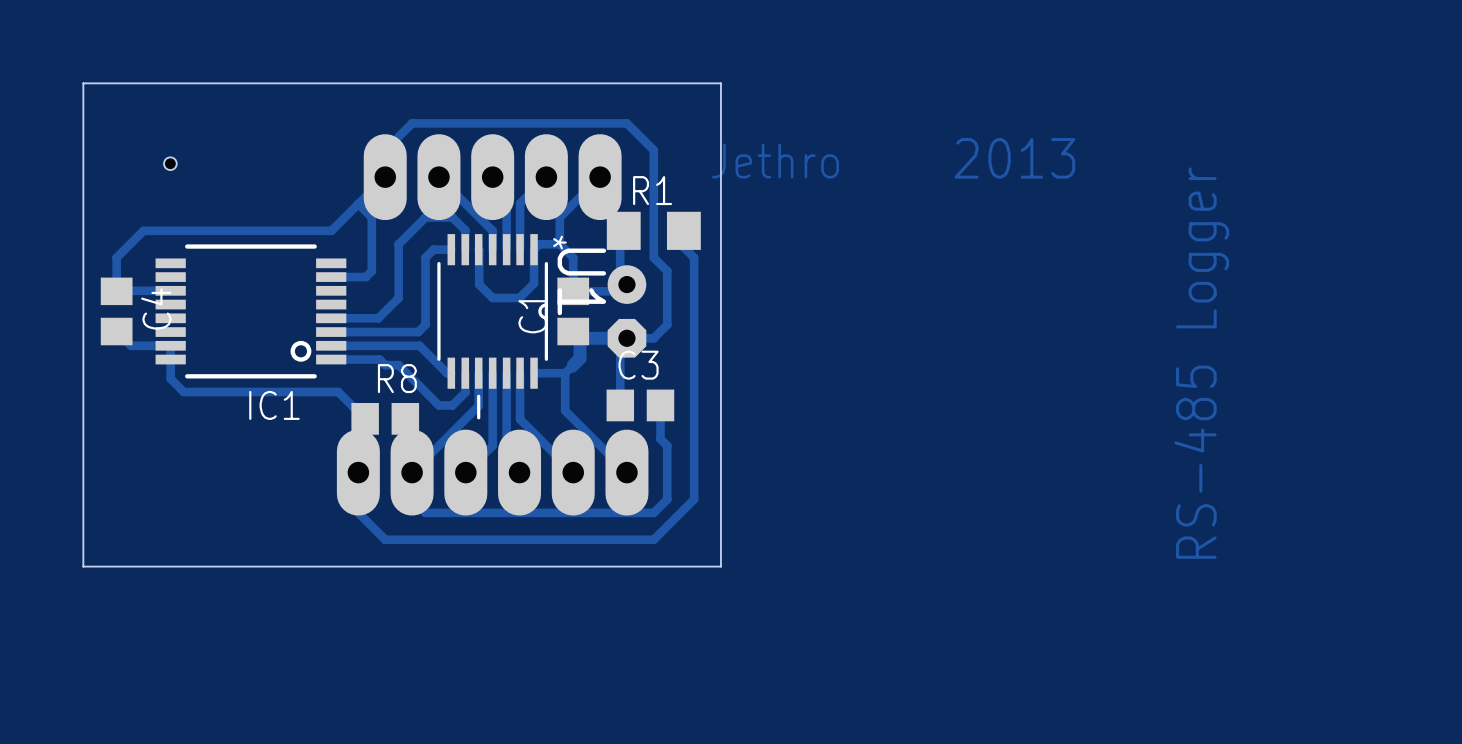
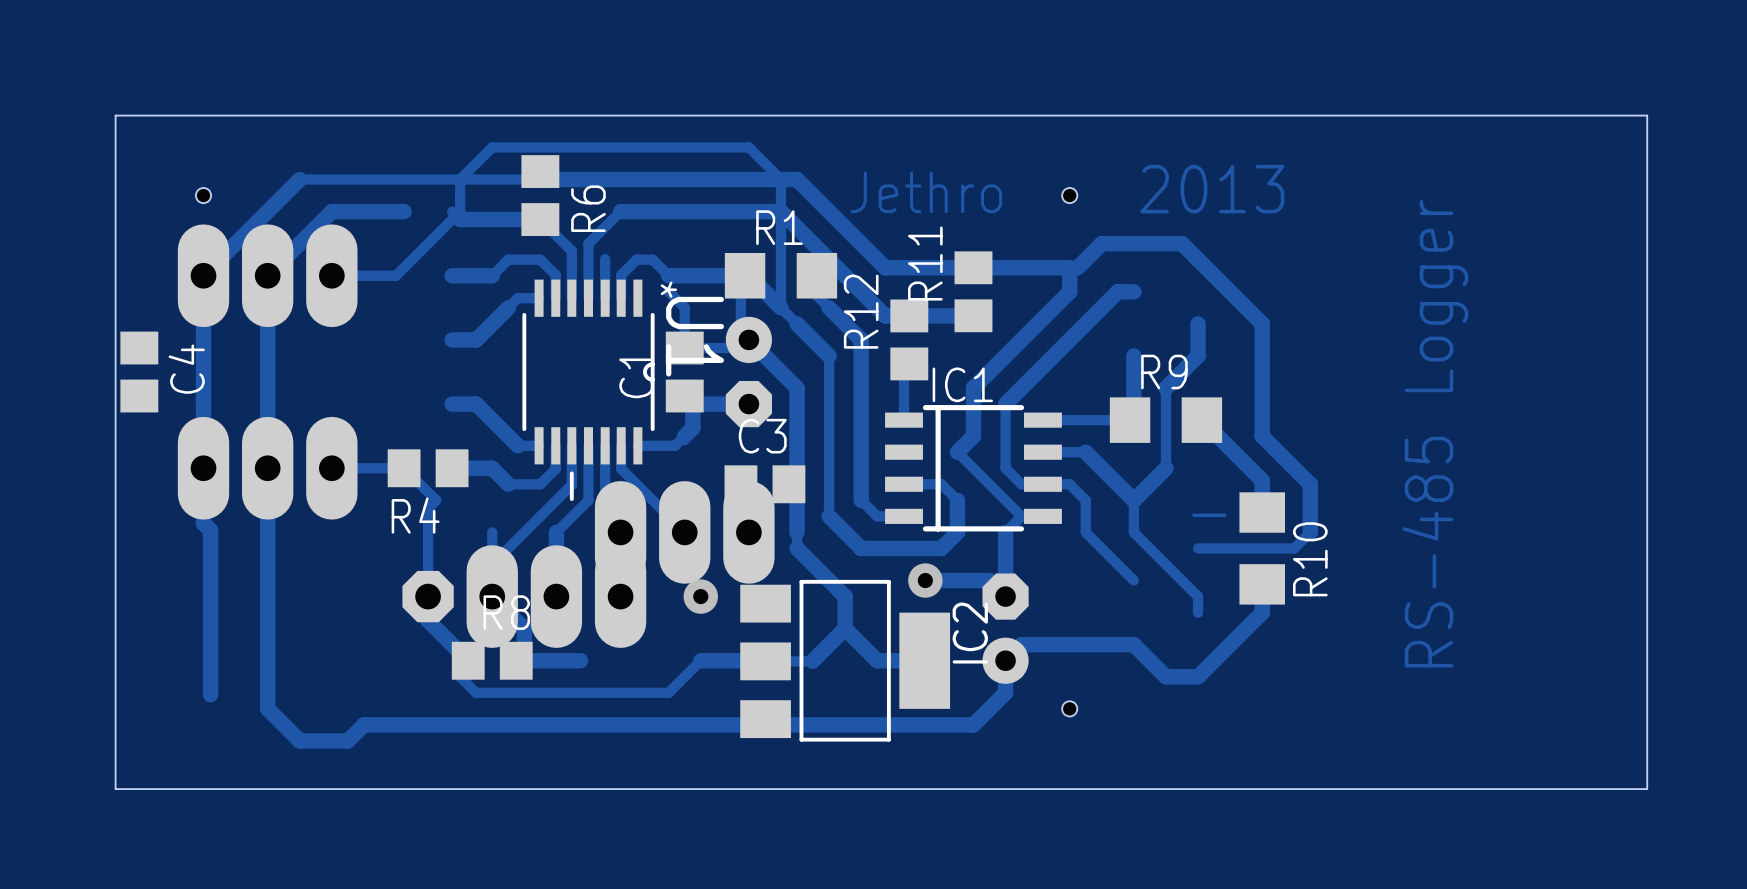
board edge: (720, 83) (83, 83) (83, 566) (720, 566) (720, 83) -> none
board edge: none -> (1647, 115) (115, 115) (115, 789) (1647, 789) (1647, 115)
R6: none -> (540, 195)
hole: none -> (1069, 195)
track: none -> (404, 211) (331, 211) (267, 275)
track: (438, 177) (492, 230) -> (973, 315) (885, 315) (780, 211) (620, 211) (588, 243) (588, 275)
part: (492, 177) -> none
track: (546, 177) (520, 203) (520, 230) -> (780, 307) (748, 275) (668, 275) (652, 259) (636, 259) (621, 275)
track: (600, 177) (559, 217) (559, 244) (539, 244) (534, 249) (534, 283) (519, 298) (492, 298) (479, 284) (478, 249) -> (452, 211) (460, 219) (540, 219) (571, 250) (571, 298)
track: (358, 204) (371, 217) (371, 271) (365, 277) (331, 277) -> none
track: none -> (1069, 267) (1077, 267) (1101, 243) (1182, 243) (1262, 323) (1262, 436) (1310, 484) (1310, 532) (1294, 548) (1198, 548)
track: none -> (1069, 267) (885, 267) (797, 179) (548, 179) (540, 171) (532, 179) (299, 179) (203, 275) (203, 523) (210, 530) (210, 694)
track: none -> (1069, 267) (1069, 291) (973, 388) (973, 436) (957, 452) (1021, 516)
track: none -> (267, 275) (267, 708) (299, 740) (347, 740) (363, 724) (759, 724) (765, 719) (771, 724) (973, 724) (1005, 692) (1005, 660) (1021, 644) (1133, 644) (1165, 676) (1198, 676) (1262, 612) (1262, 584)
part: none -> (267, 275)
track: (277, 230) (143, 230) (116, 257) (116, 291) (170, 290) -> none
track: (412, 230) (398, 244) (398, 298) (378, 318) (331, 318) -> (492, 275) (452, 275)
IC1 footprint: [155, 244, 347, 379] -> [885, 405, 1062, 532]
R11: none -> (973, 291)
track: none -> (1133, 291) (1117, 291) (1005, 404) (1005, 468) (1021, 484) (1069, 484) (1085, 500) (1085, 532) (1133, 580)
track: (425, 257) (425, 324) (418, 332) (331, 332) -> (508, 307) (476, 339) (452, 339)
track: (694, 257) (694, 298) -> (797, 323) (829, 355)
track: none -> (829, 307) (861, 339) (861, 500) (877, 516) (904, 516)
track: (667, 271) (667, 324) (653, 338) (626, 338) (620, 344) (620, 405) -> none
track: none -> (1198, 323) (1198, 355) (1165, 388) (1165, 468) (1133, 500)
R12: none -> (909, 339)
track: none -> (1133, 355) (1133, 416) (1130, 420) (1042, 420)
track: none -> (909, 363) (904, 369) (904, 420)
track: (116, 331) (130, 345) (170, 345) (170, 378) (183, 392) (277, 392) -> none
track: (331, 345) (419, 345) (447, 373) -> (452, 404) (476, 404) (517, 445) (533, 445)
R9: none -> (1165, 420)
track: none -> (1201, 420) (1262, 480) (1262, 512)
track: (331, 359) (379, 359) (385, 365) (398, 365) (438, 405) -> (452, 468) (492, 468) (508, 484) (524, 484)
track: (565, 373) (565, 410) (626, 472) -> none
track: none -> (1042, 452) (1085, 452) (1133, 500)
part: none -> (267, 468)
R4: none -> (428, 468)
track: (520, 392) (520, 419) (573, 472) -> (621, 468) (684, 532)
IC1 name position: IC1 (274, 405) -> IC1 (962, 384)
track: (660, 405) (660, 438) (667, 445) -> (748, 339) (797, 388) (797, 532)
track: none -> (904, 484) (941, 484) (957, 500) (957, 532) (941, 548) (861, 548) (829, 516)
R8 position: (385, 418) -> (492, 660)
track: (492, 418) (492, 445) (465, 472) -> (588, 500) (556, 532) (556, 596)
track: none -> (1133, 500) (1133, 532) (1198, 596) (1198, 612)
text: none -> - (1209, 515)
track: (694, 432) (694, 499) (653, 539) (385, 539) (358, 512) -> (845, 628) (812, 661) (700, 660) (668, 692) (476, 692) (460, 676) (460, 668) (468, 660) (428, 620) (428, 612)
track: none -> (1021, 516) (1005, 532) (1005, 596) (989, 580) (925, 580)
part: none -> (684, 532)
track: (667, 459) (667, 499) (653, 512) (425, 512) -> (580, 660) (516, 660) (524, 652) (524, 628) (508, 612)
track: none -> (797, 548) (845, 596) (845, 628)
R10: none -> (1262, 548)
part: (492, 472) -> none
via: none -> (925, 580)
part: none -> (428, 596)
part: none -> (556, 596)
via: none -> (700, 596)
track: none -> (845, 628) (877, 660) (924, 660)
part: none -> (1005, 628)
IC2: none -> (845, 660)
hole: none -> (1069, 708)

